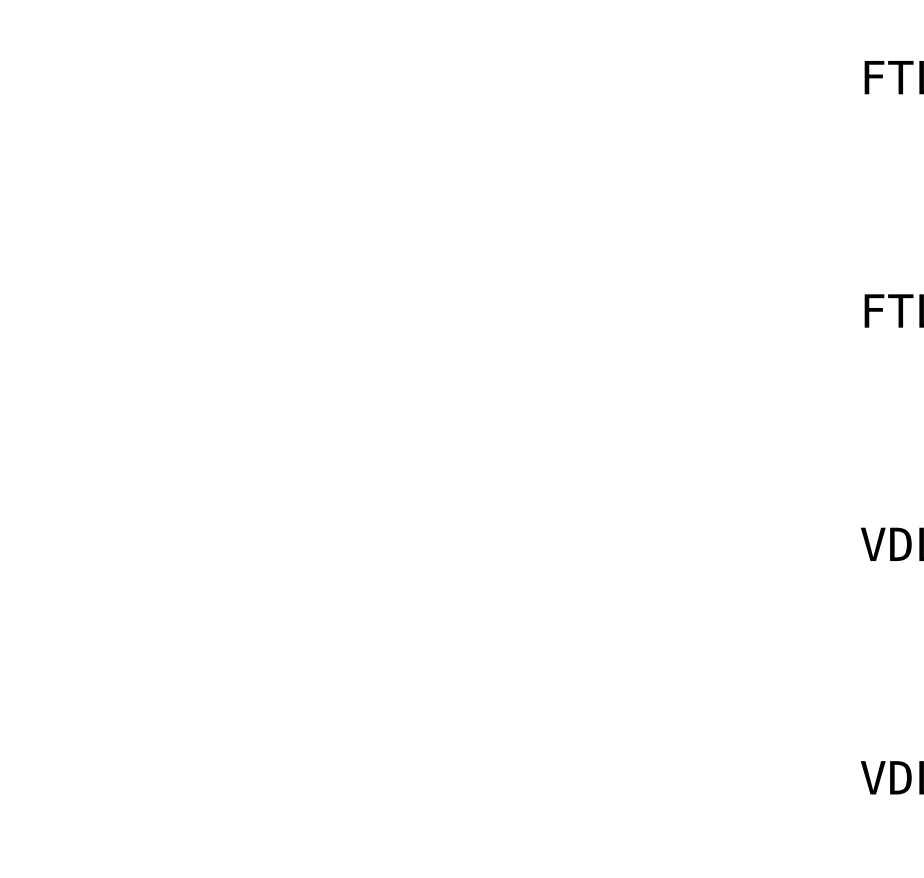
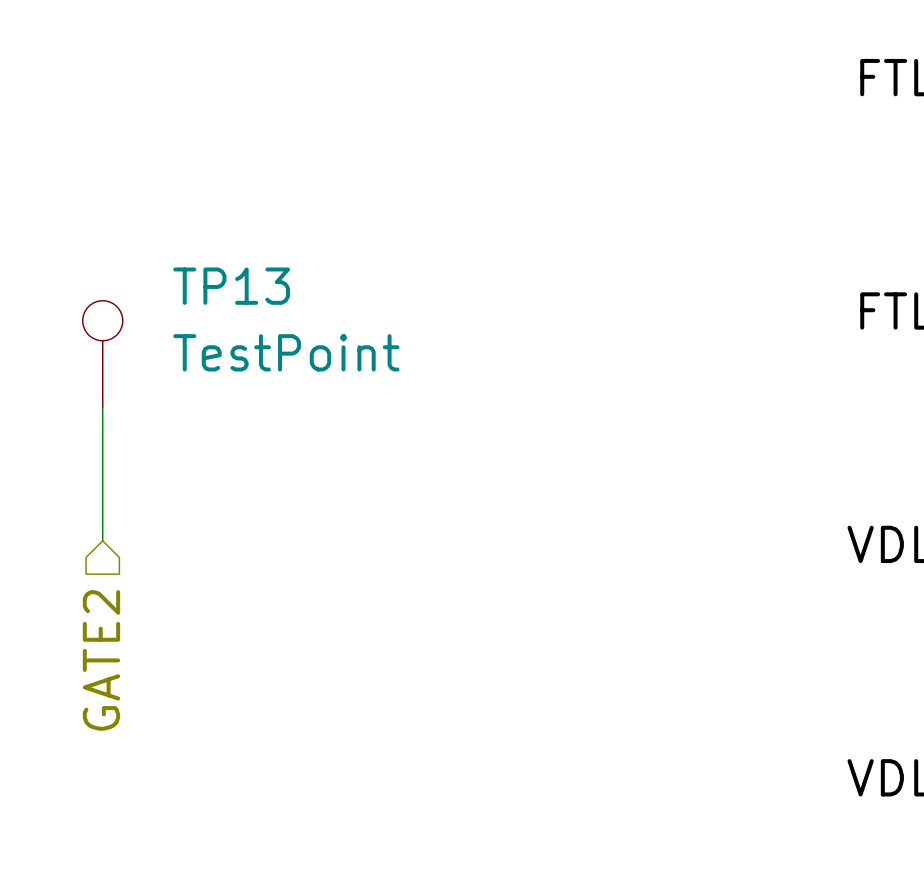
TP13: none -> TestPoint (102, 354)
wire: none -> (102, 407) (102, 540)
hierarchical label: none -> GATE2 (101, 660)

